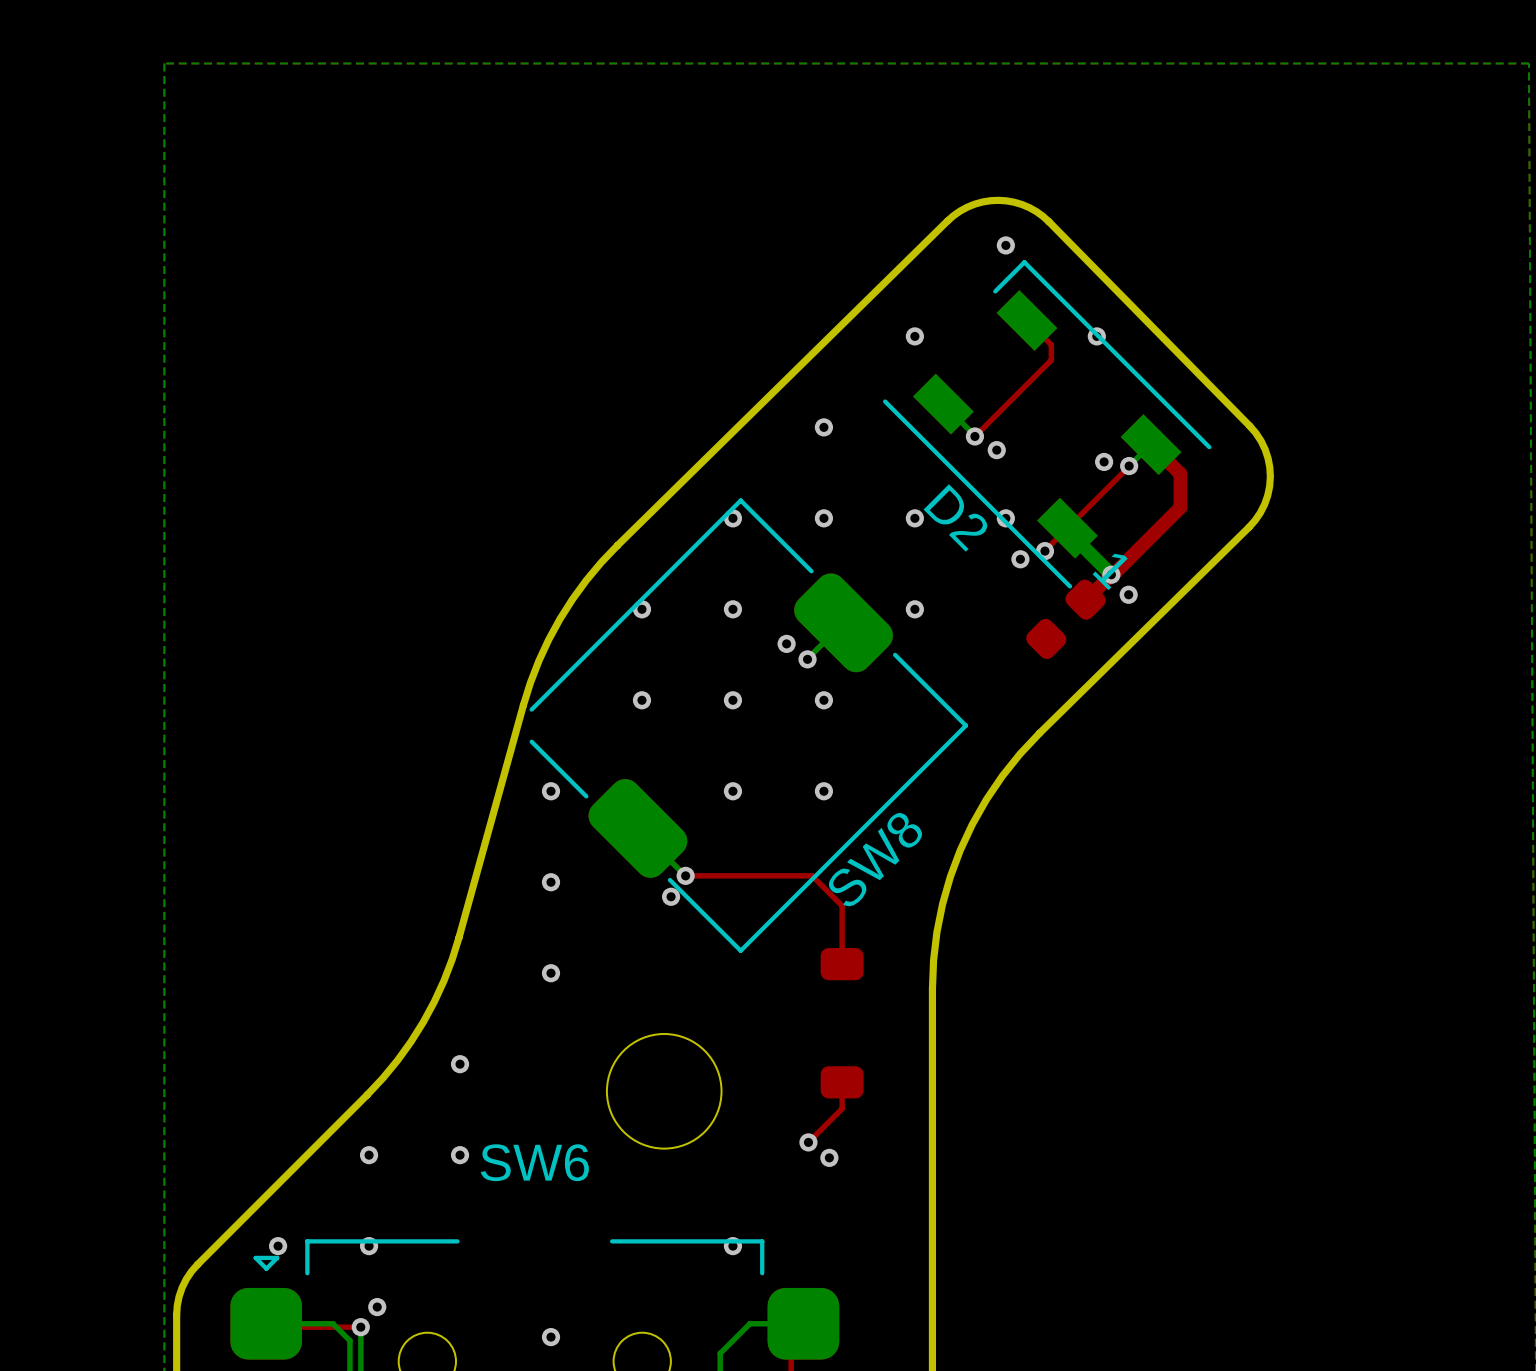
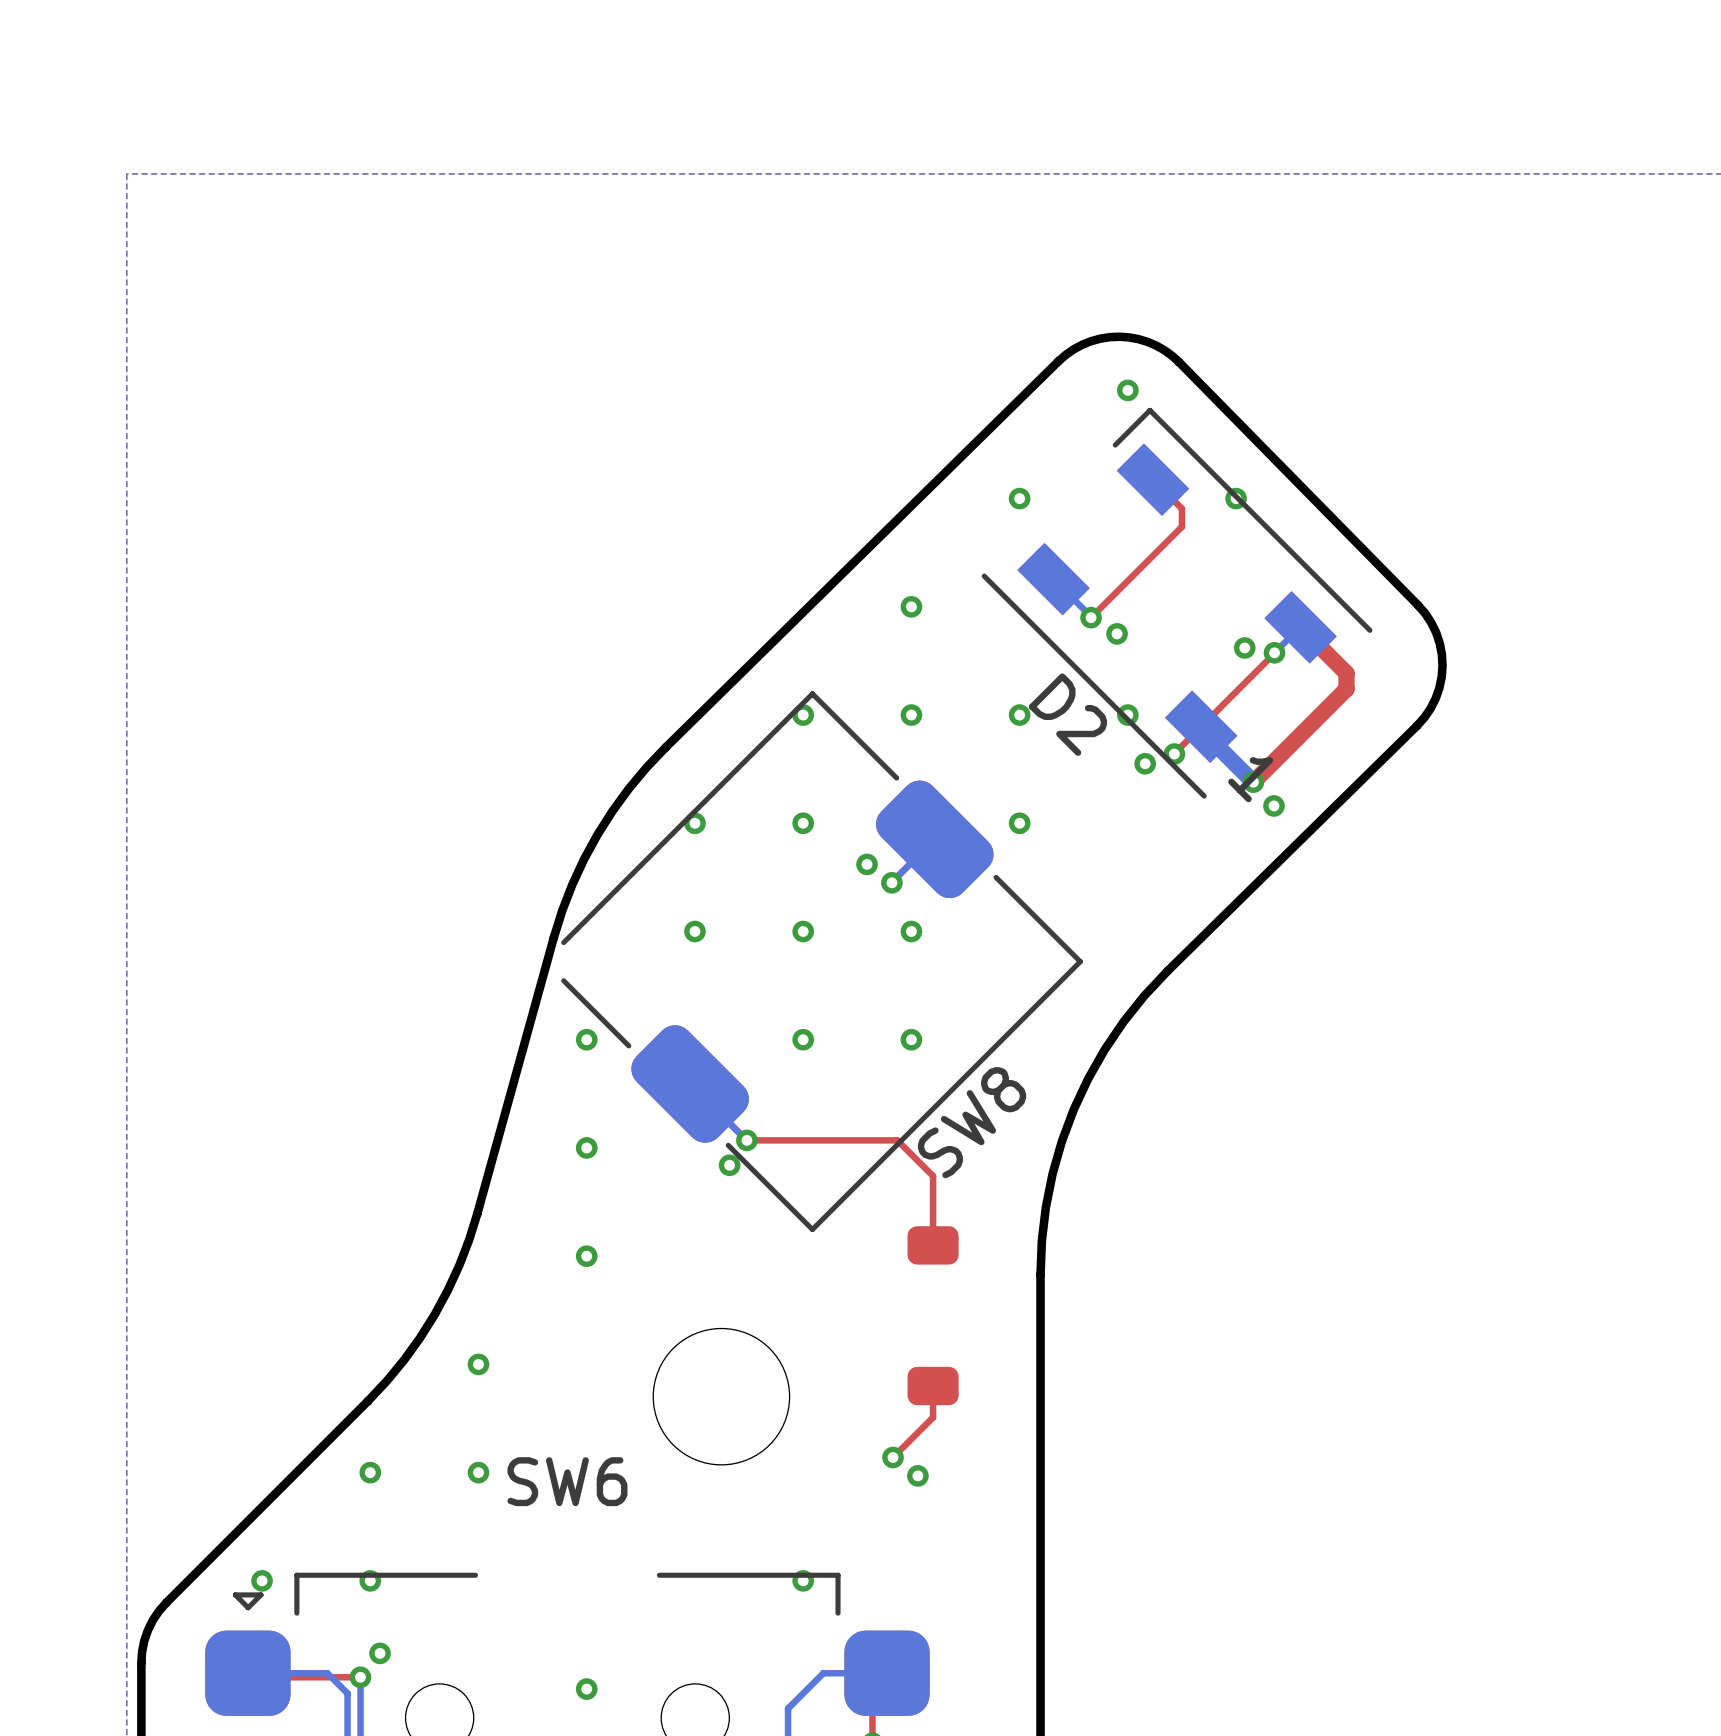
top track: (1180, 473) (1180, 507) (1085, 599) -> (1335, 662) (1346, 673) (1346, 689) (1253, 782)
part: (1065, 619) -> none

